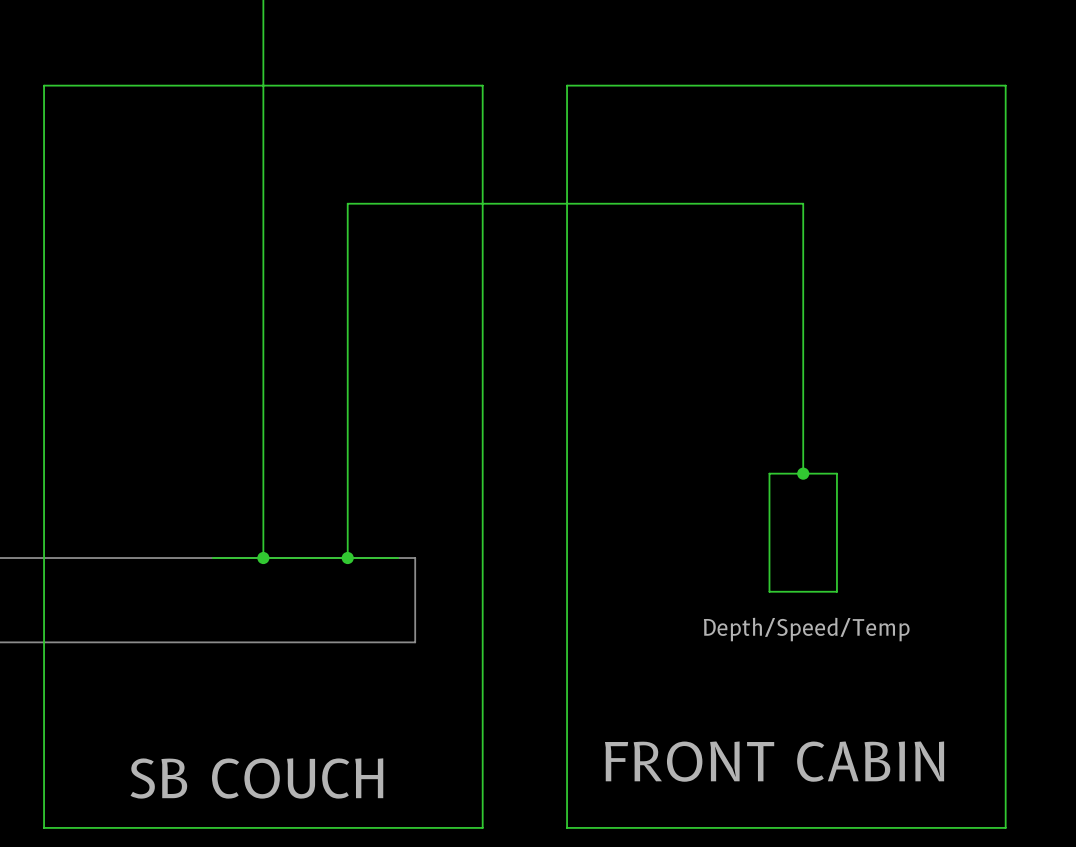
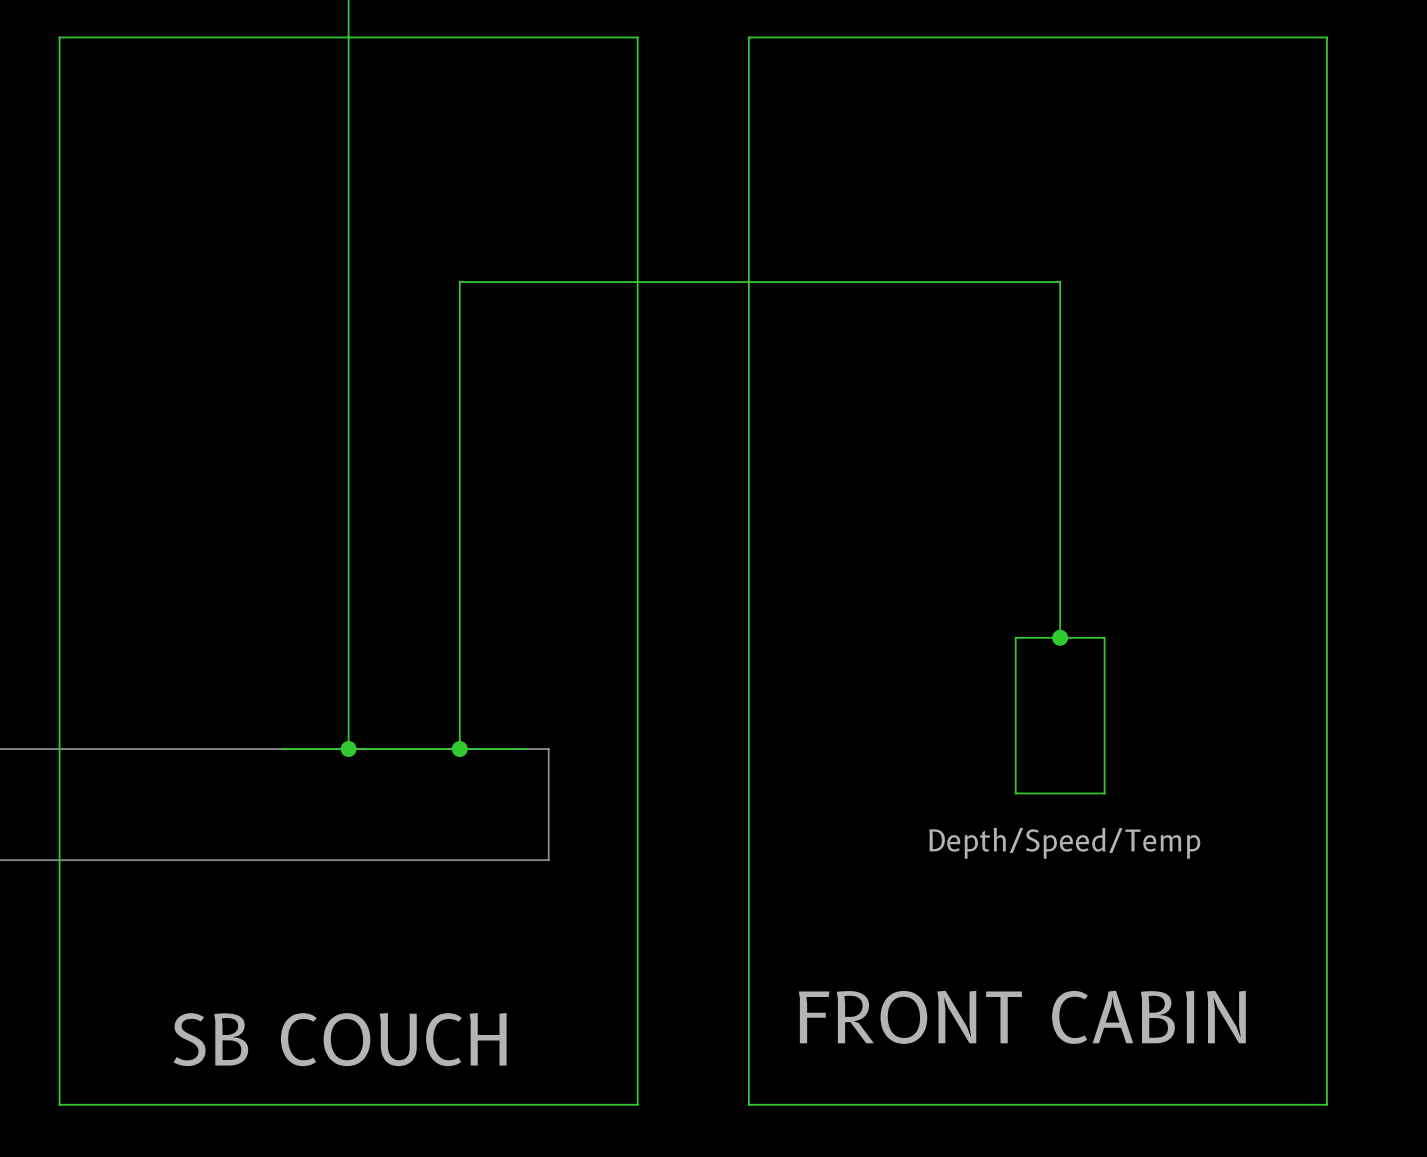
wire: (44, 85) (482, 85) -> (59, 126) (59, 37) (637, 37) (637, 126)
wire: (567, 85) (1005, 85) -> (748, 126) (748, 37) (1326, 37) (1326, 126)

